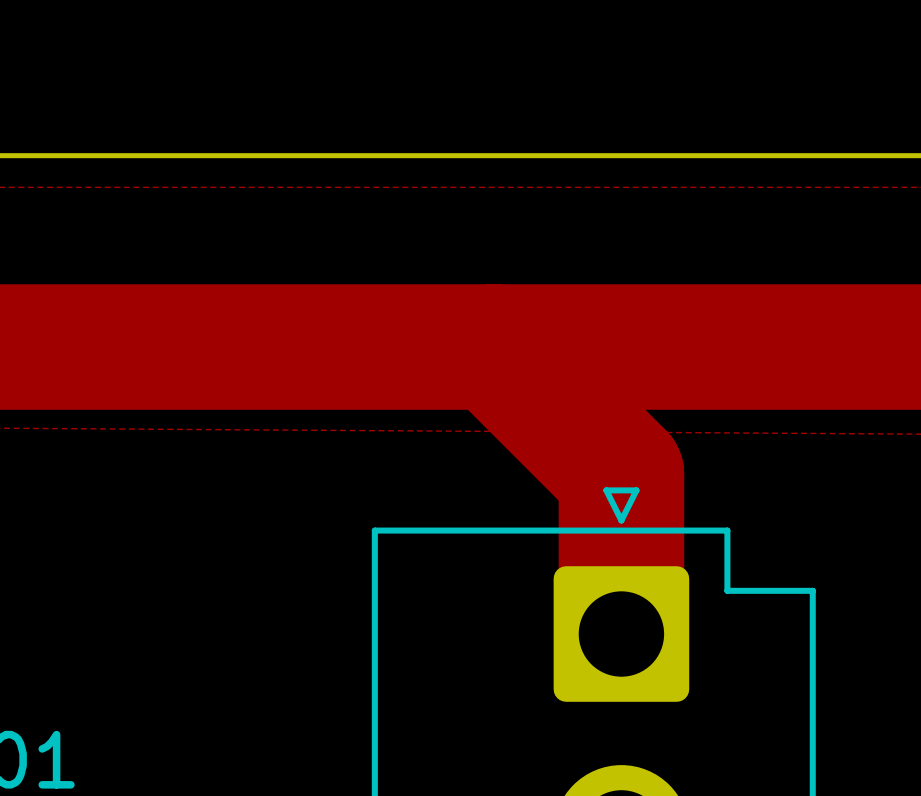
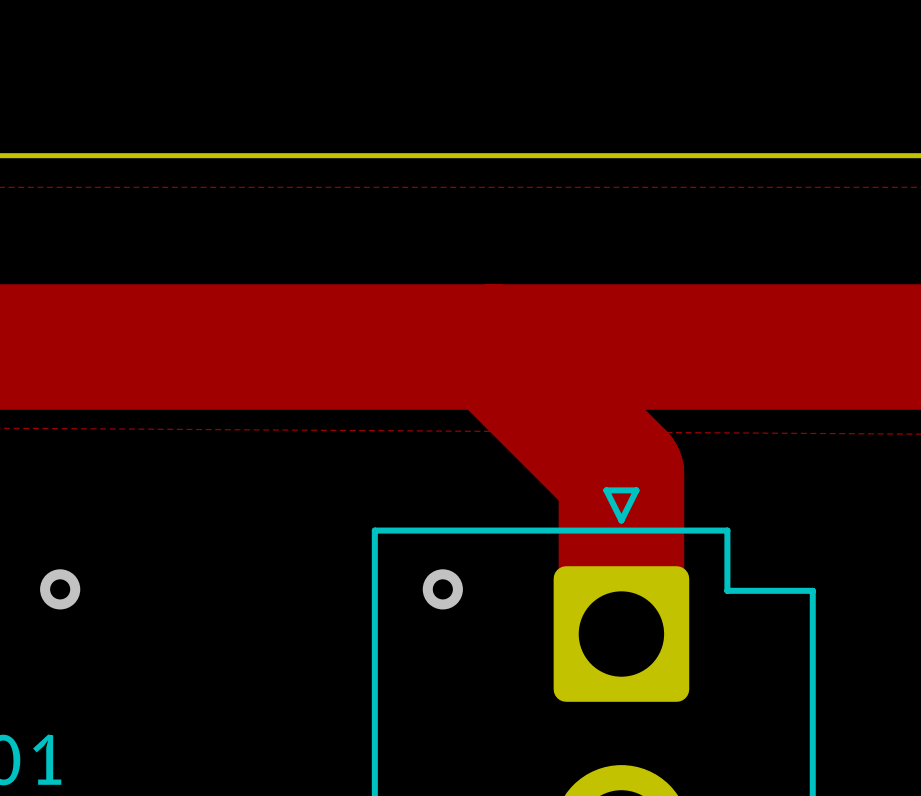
via: none -> (60, 589)
via: none -> (442, 589)

